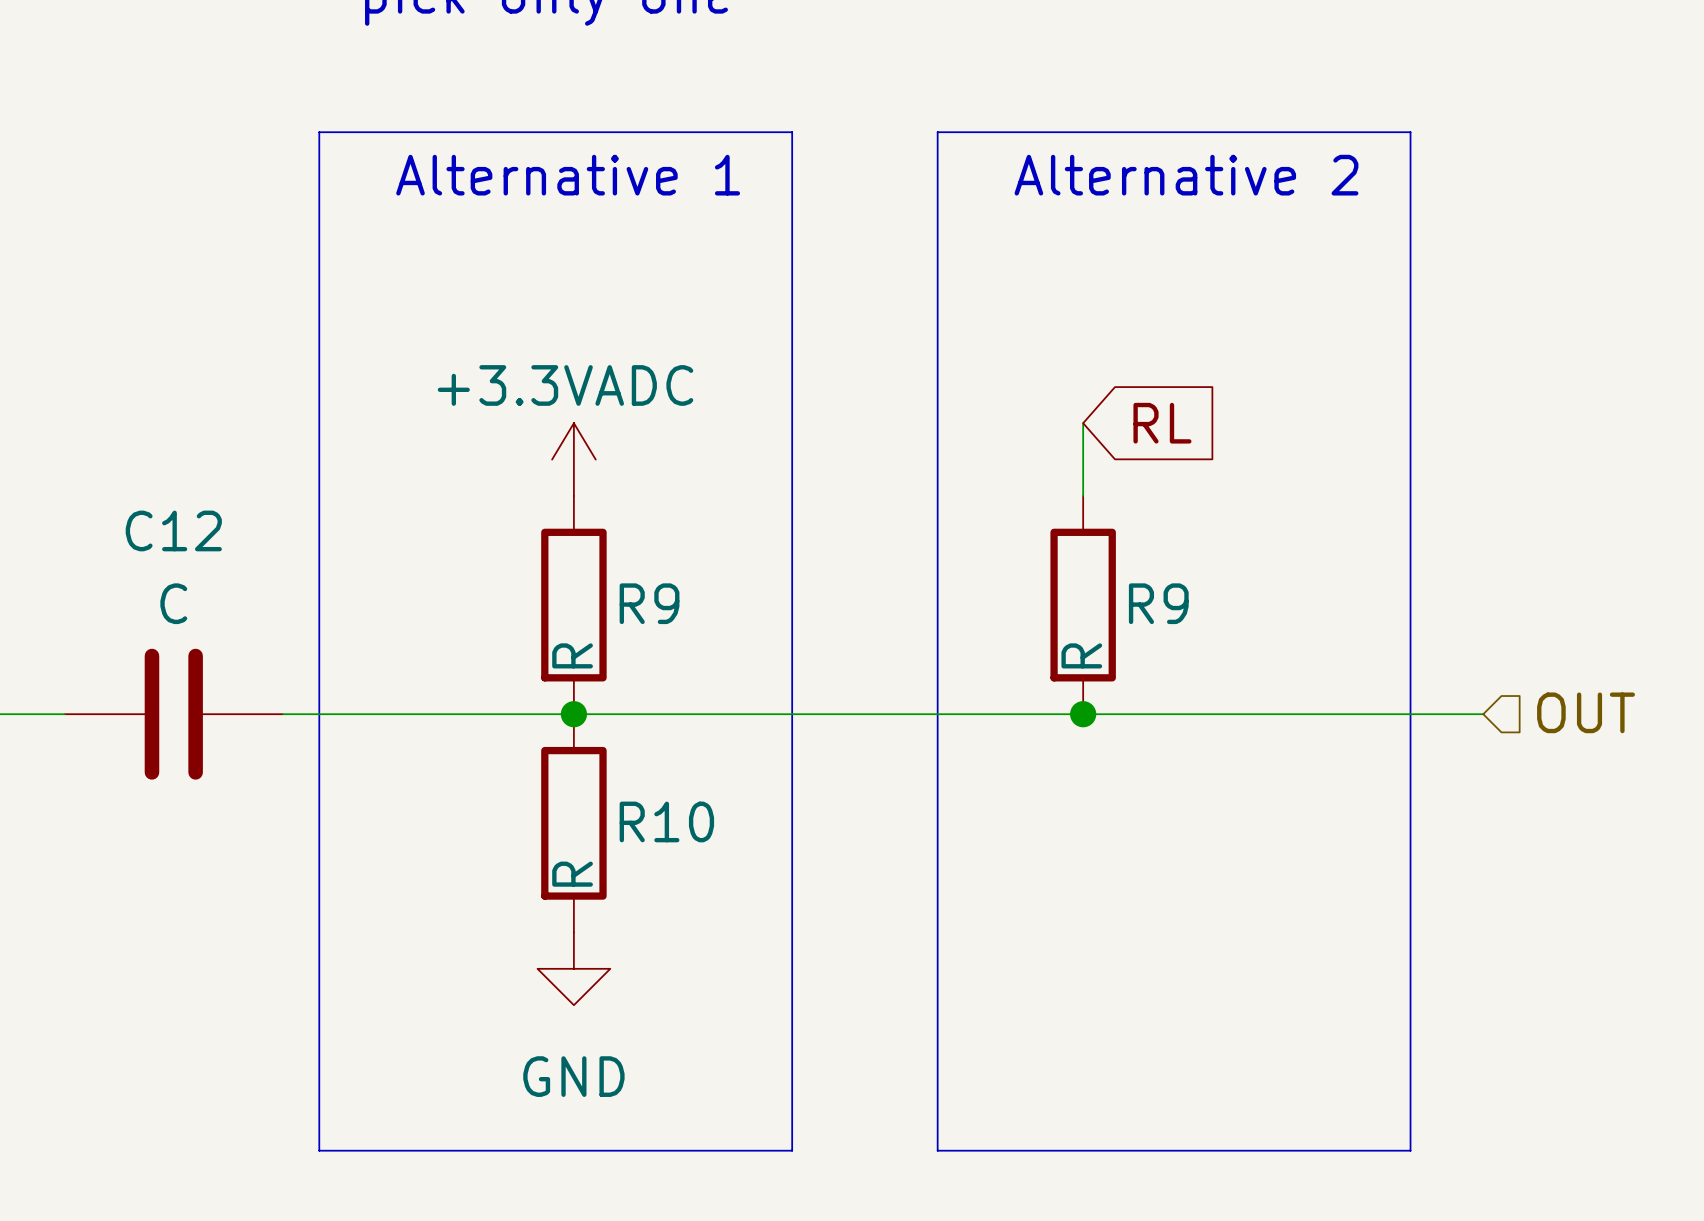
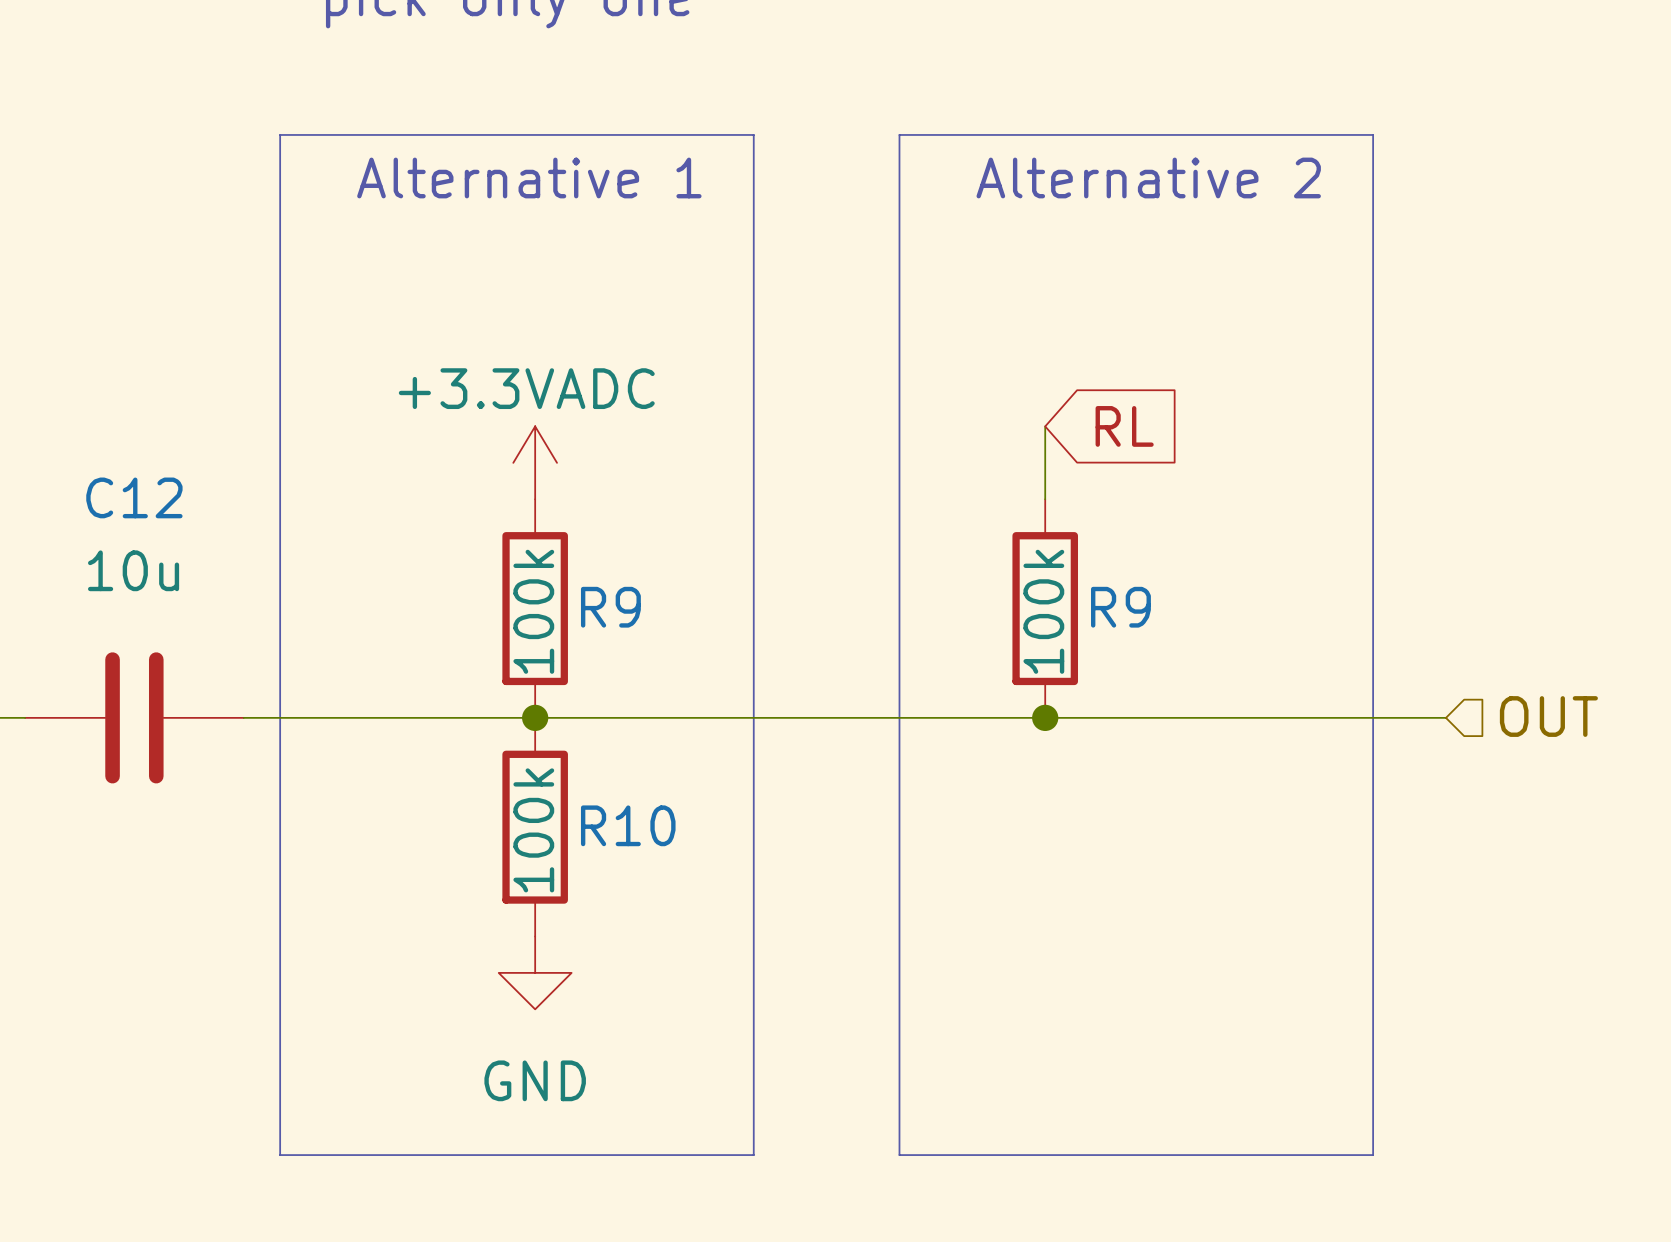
C12 name position: C12 (173, 530) -> C12 (134, 497)
C12 value: C (173, 603) -> 10u (133, 570)
R9 value: R (572, 655) -> 100k (533, 611)
R9 value: R (1081, 655) -> 100k (1043, 611)
R10 value: R (572, 874) -> 100k (533, 830)

